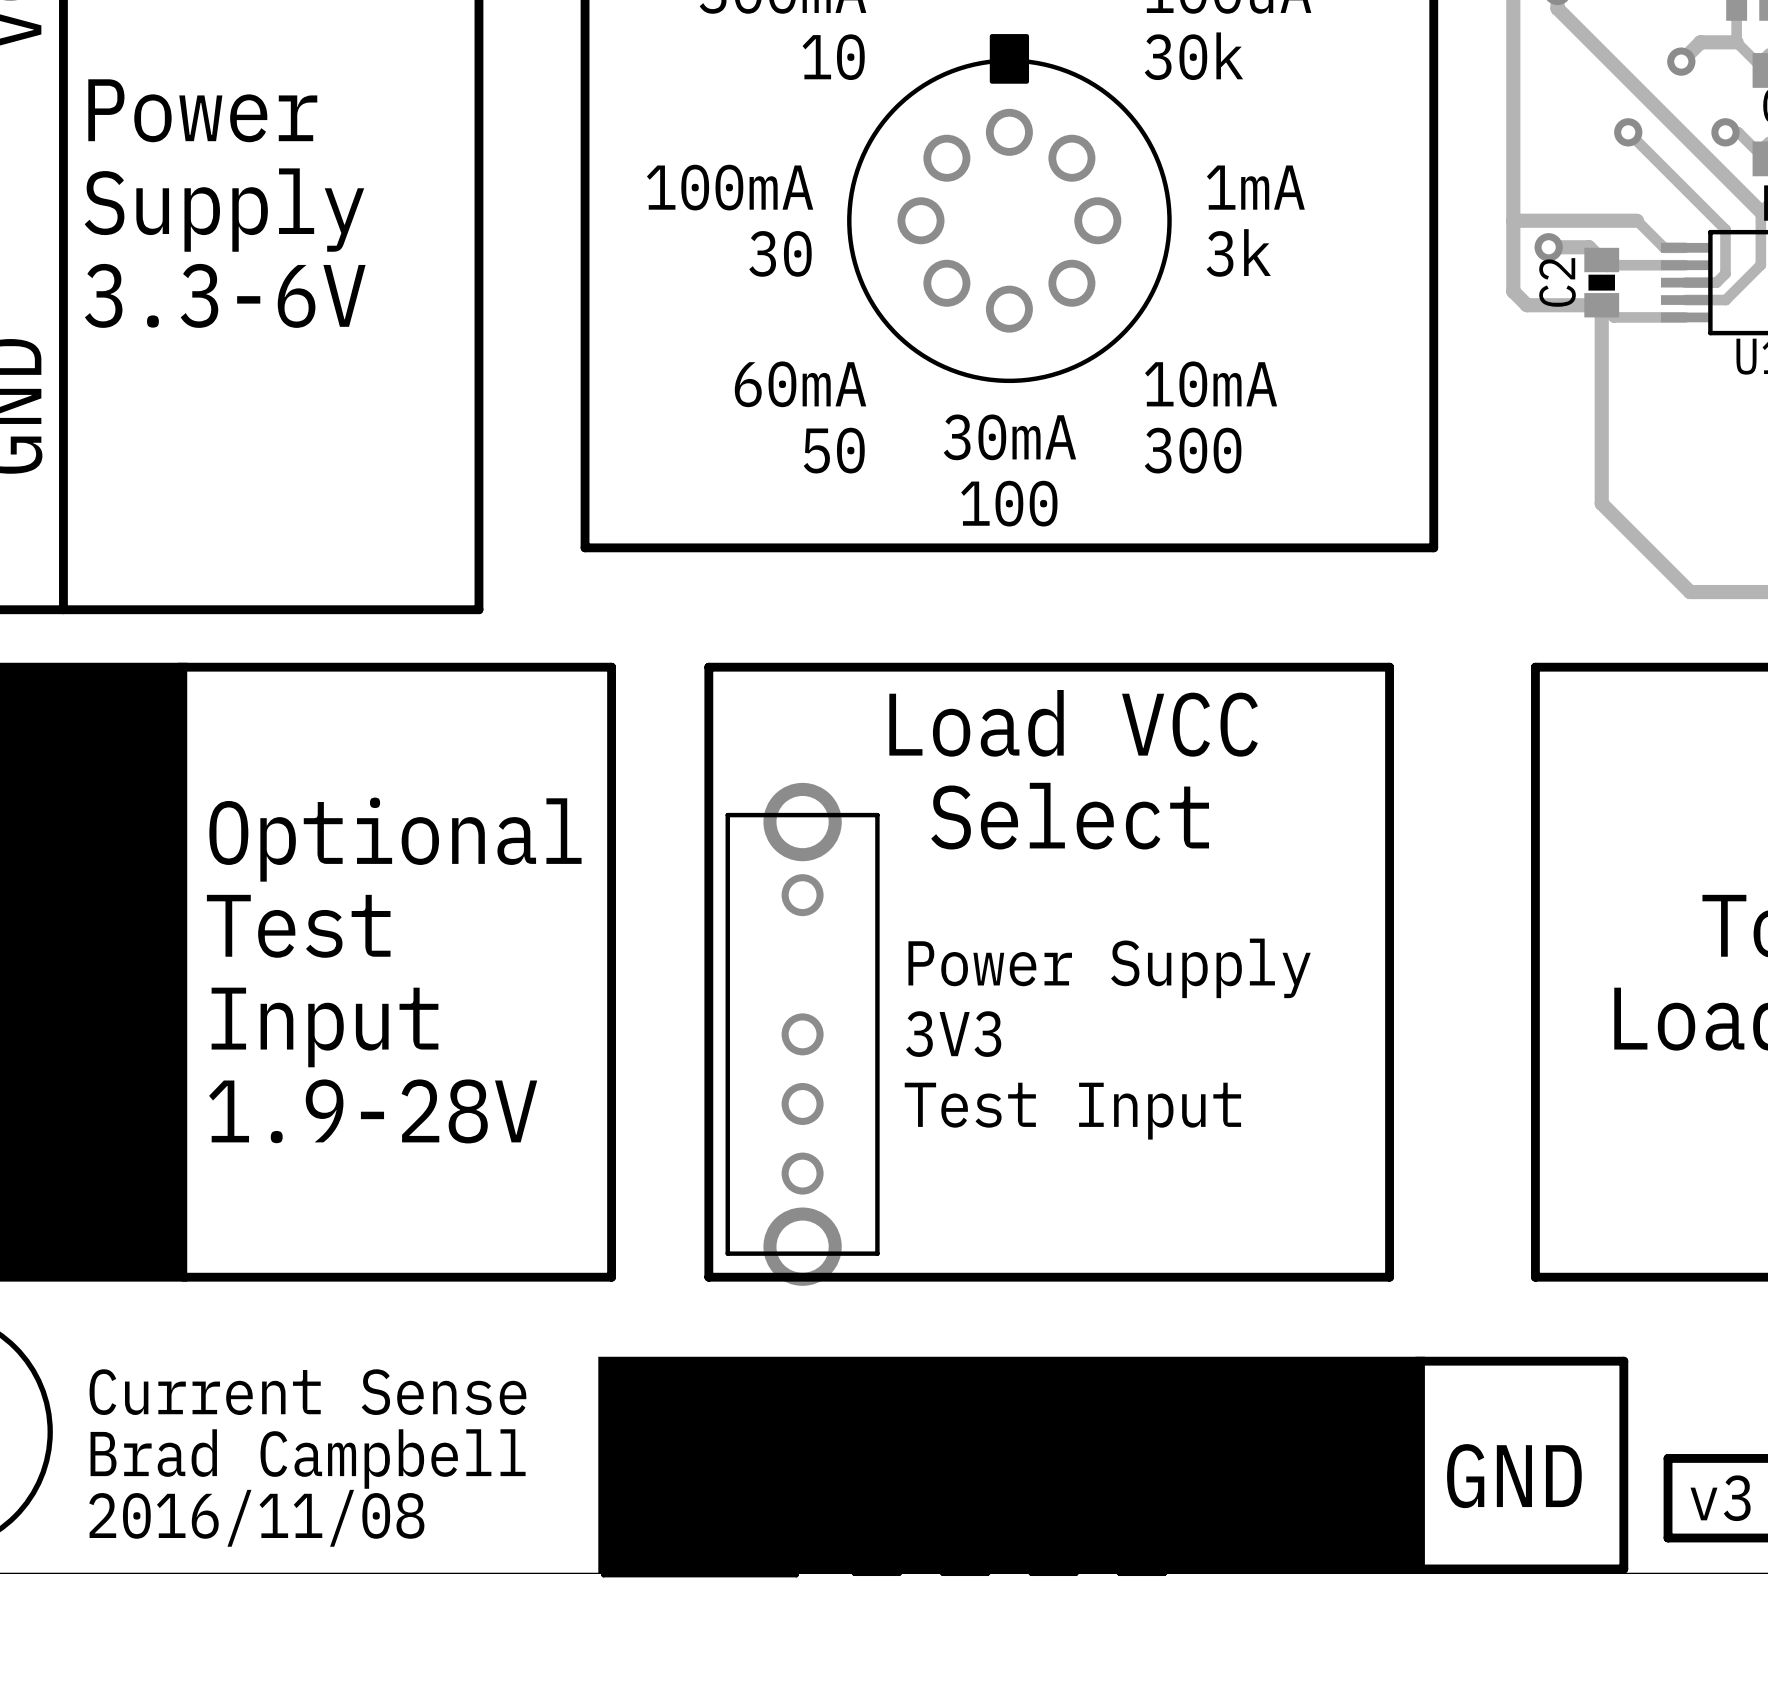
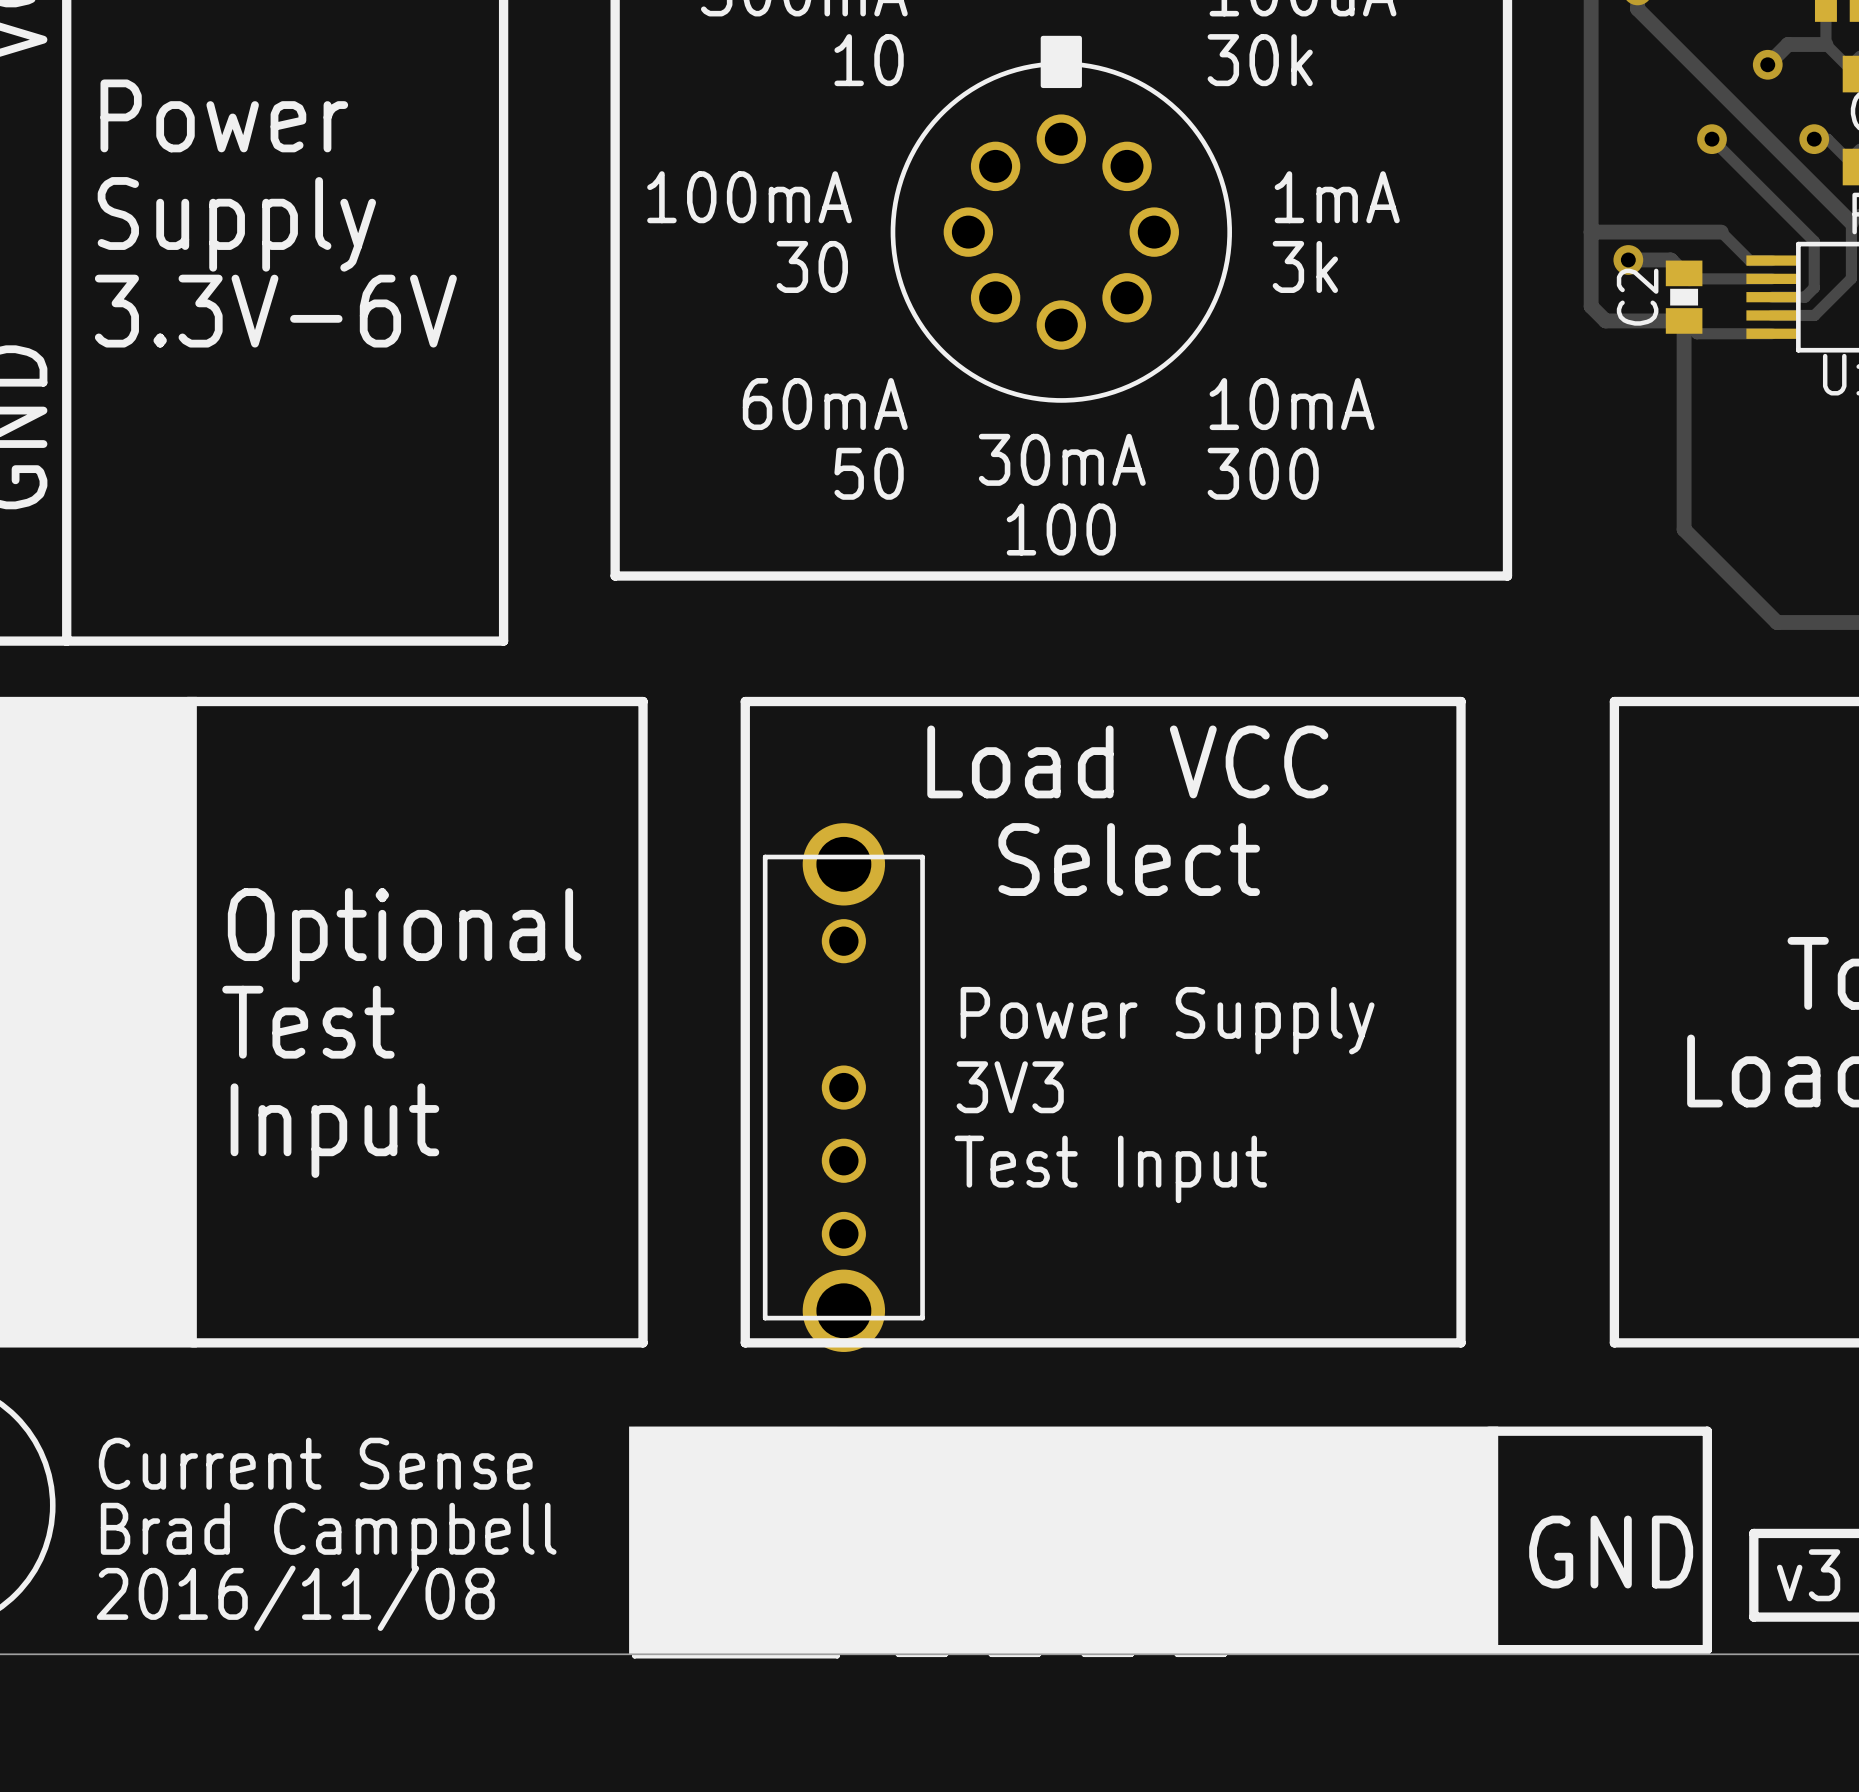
text: 3.3-6V (225, 295) -> 3.3V-6V (275, 311)
text position: Optional (395, 839) -> Optional (404, 935)
text position: Test (298, 926) -> Test (308, 1022)
text position: Input (325, 1027) -> Input (334, 1130)
text: 1.9-28V (373, 1111) -> none

